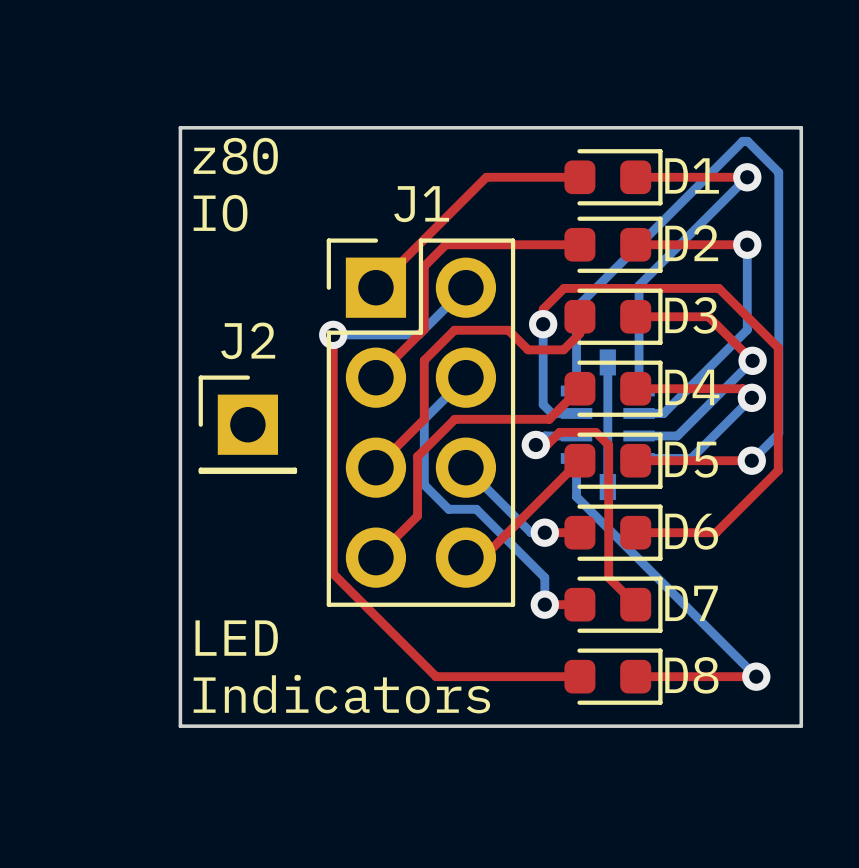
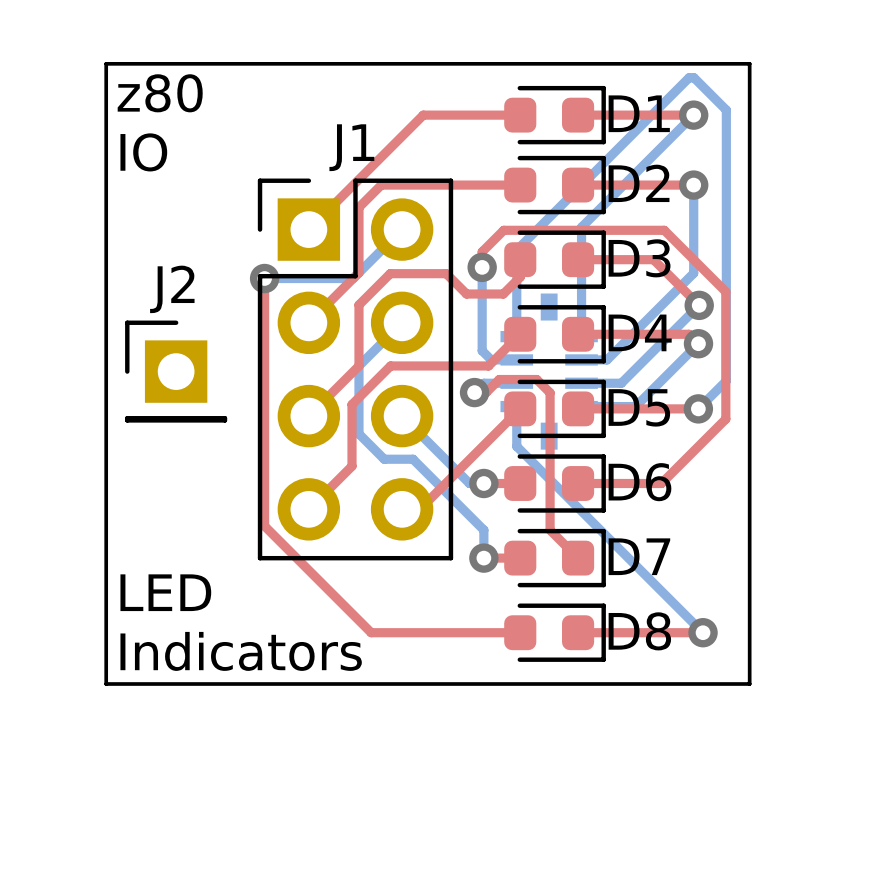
bottom track: (607, 362) (607, 487) -> none

